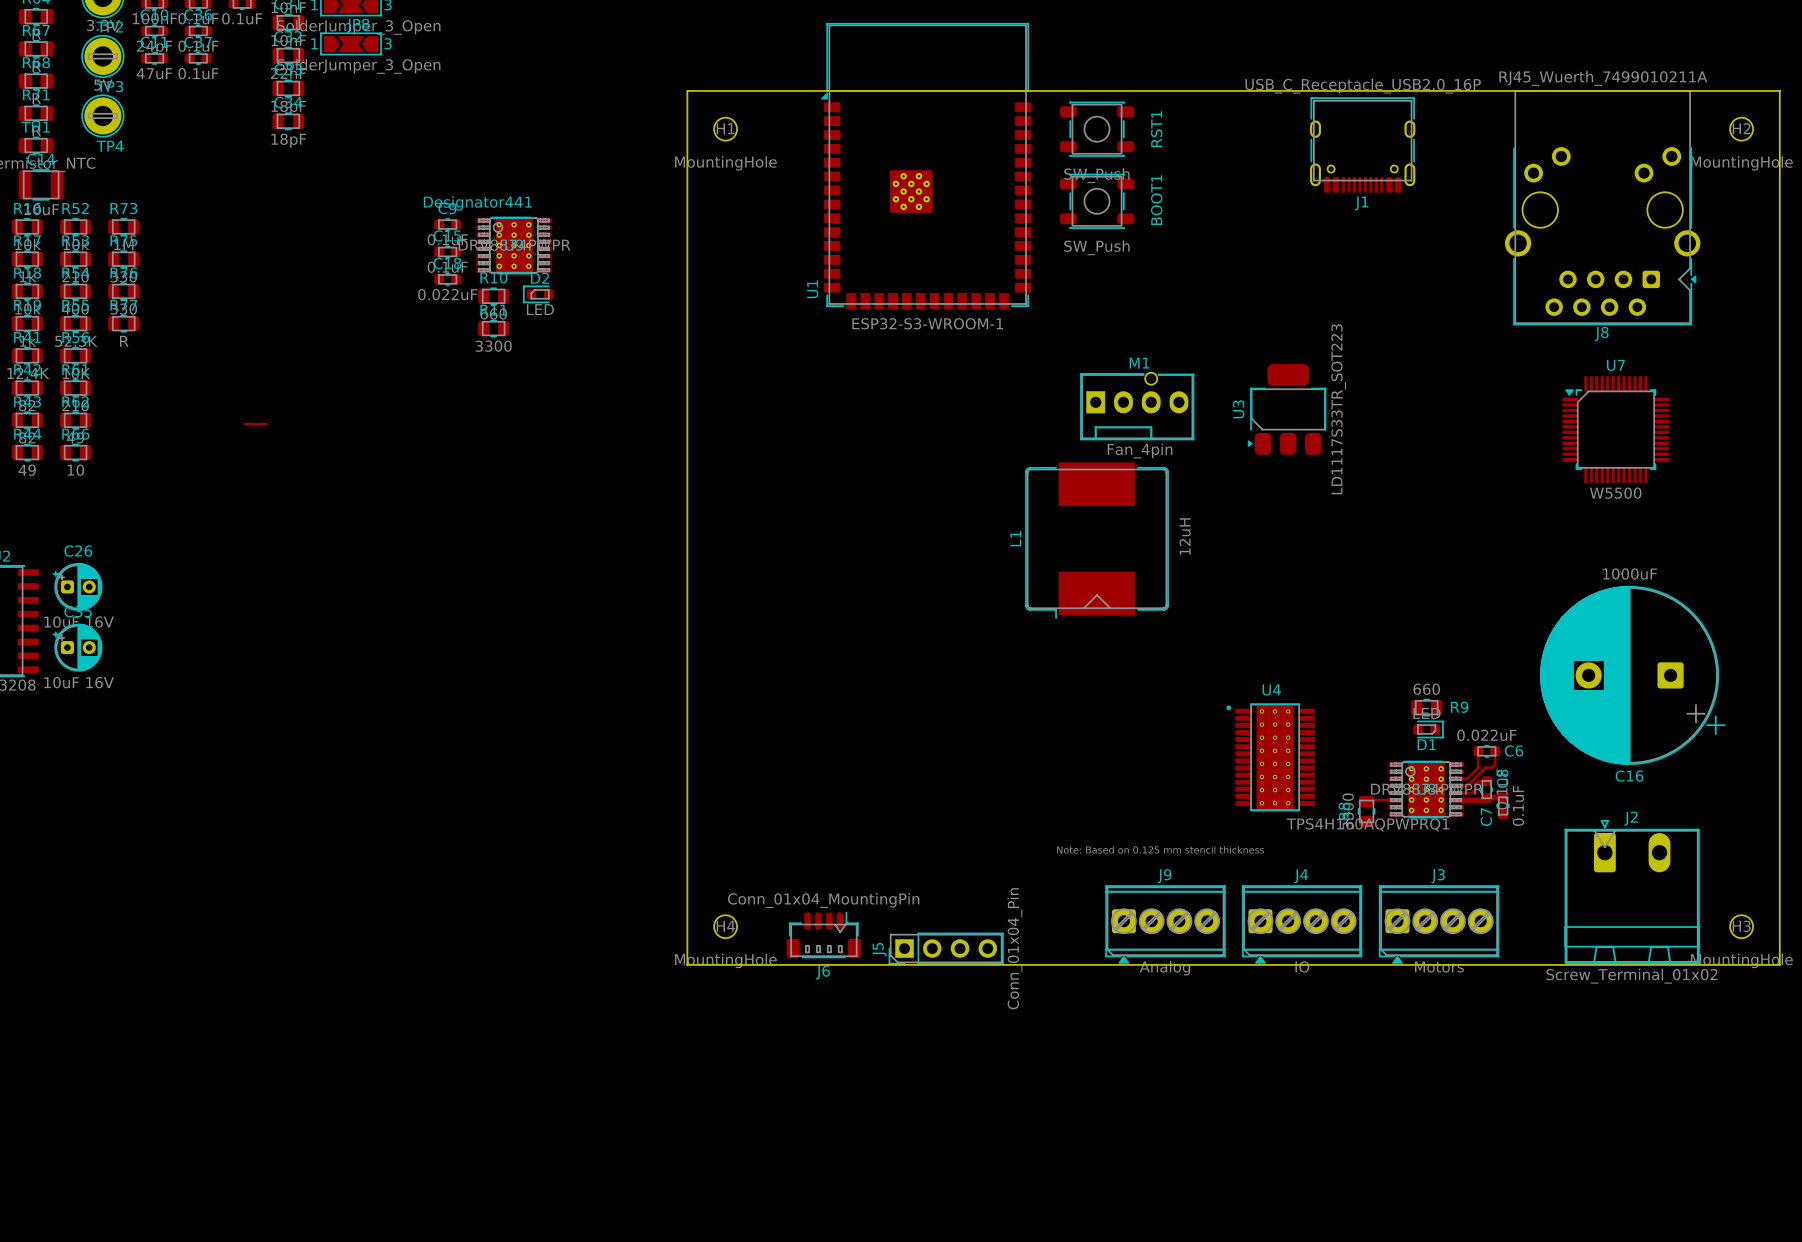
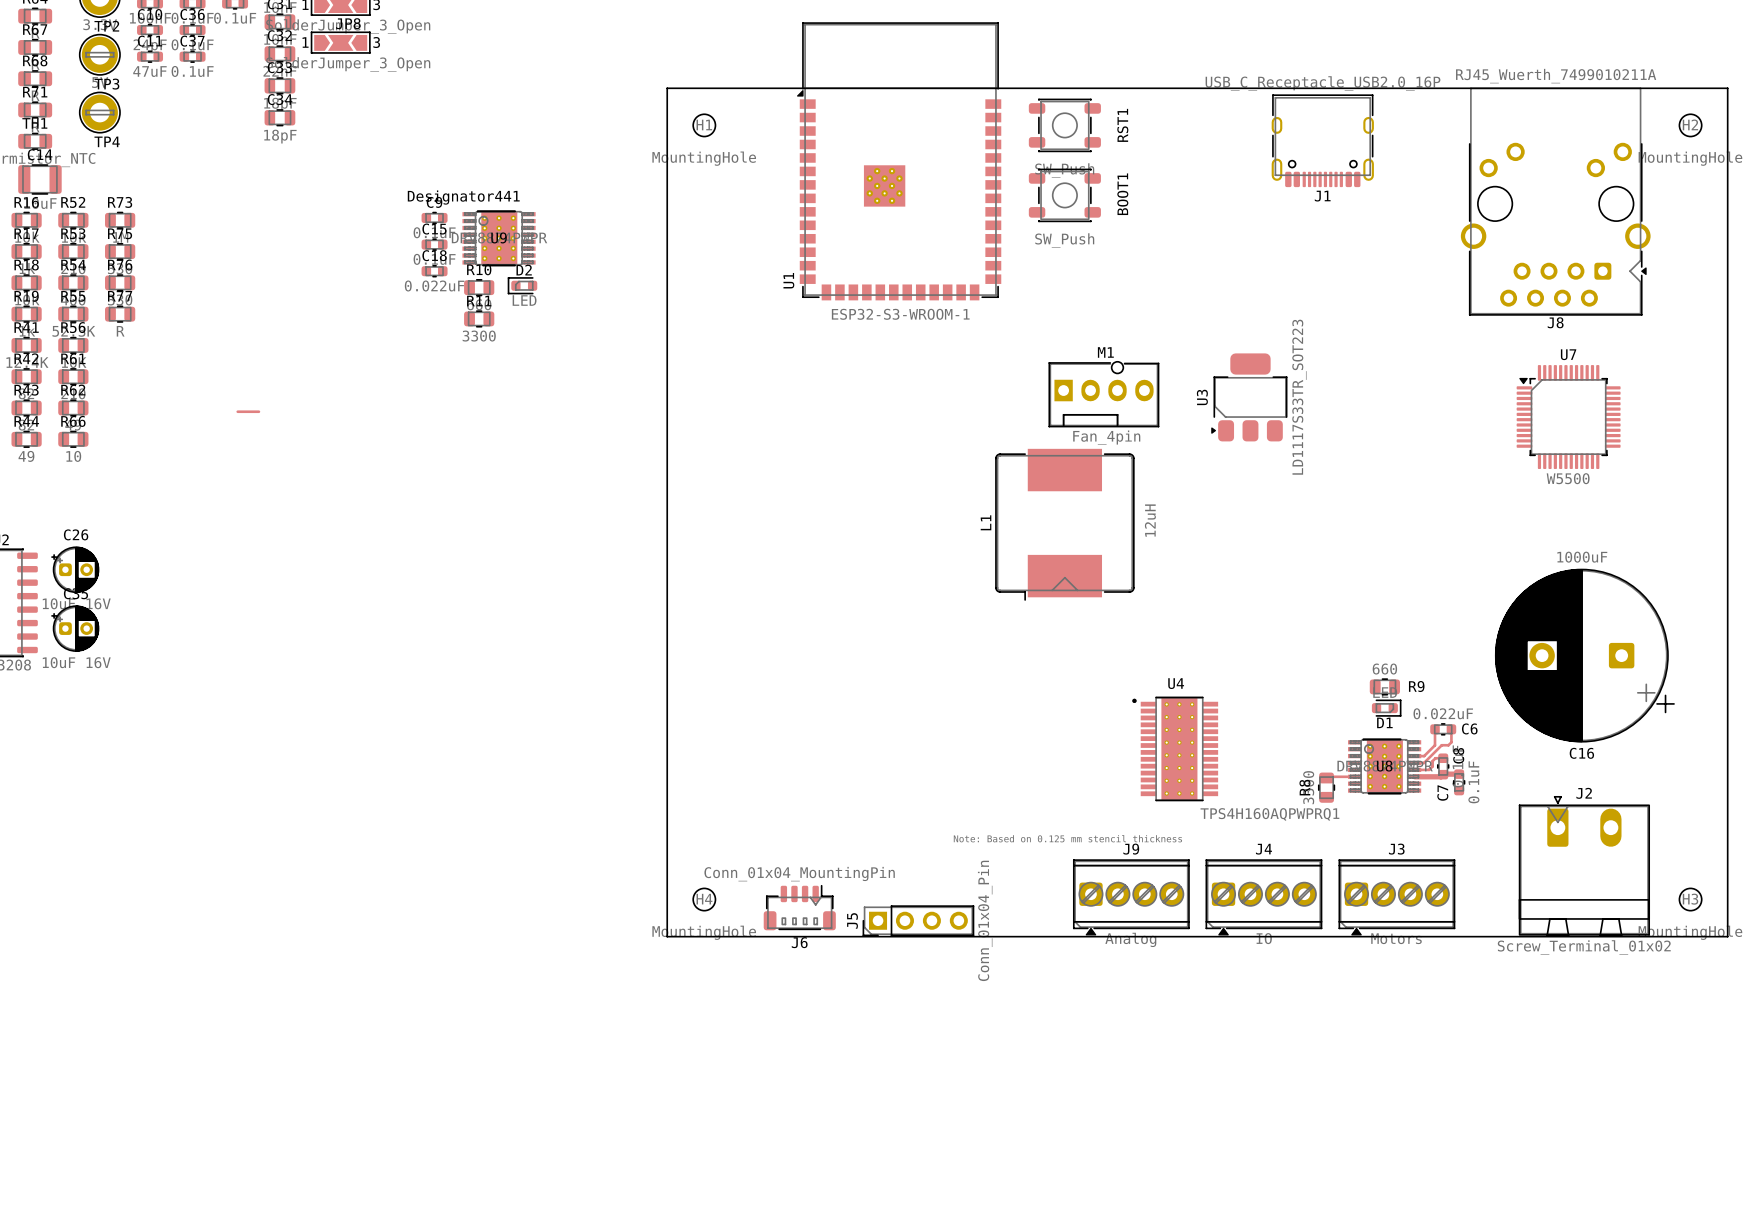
U4 position: (1270, 757) -> (1175, 748)

